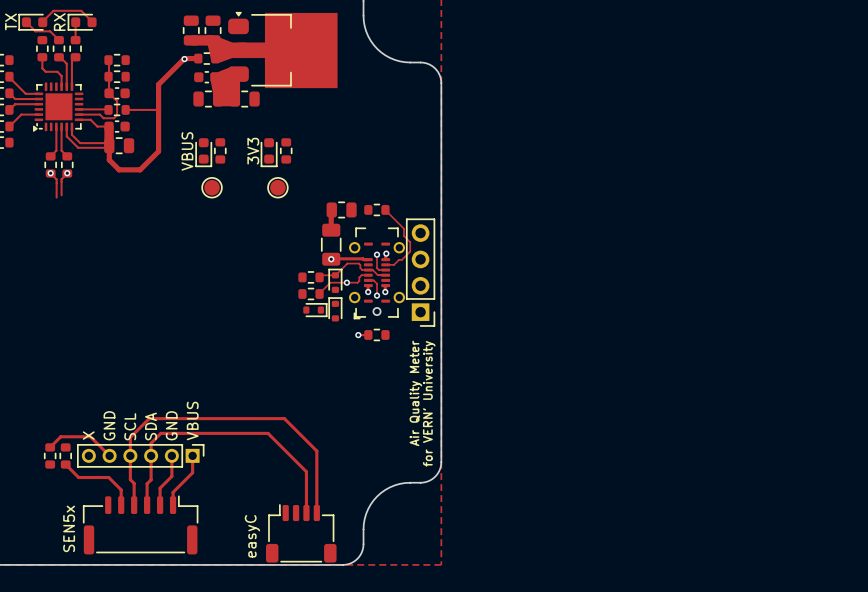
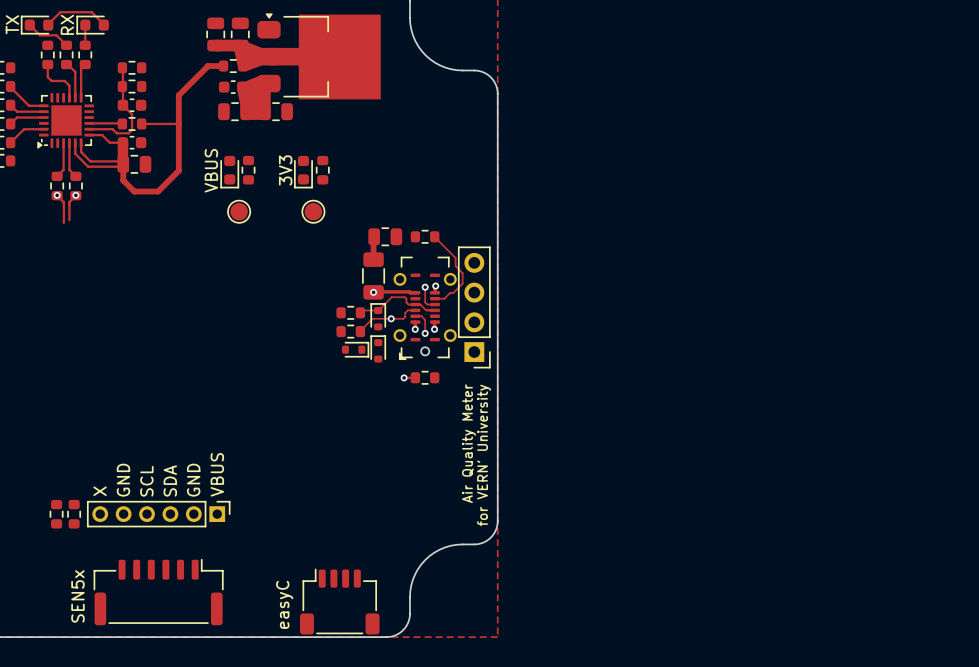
via: (184, 59) -> none
track: (50, 447) (60, 436) (90, 436) (109, 455) -> none
track: (171, 455) (171, 476) (160, 488) (160, 505) -> none
track: (192, 455) (192, 472) (173, 492) (173, 505) -> none
track: (65, 464) (78, 477) (108, 477) (121, 489) (121, 505) -> none
track: (134, 505) (134, 483) (130, 479) (130, 437) (149, 418) (284, 418) (316, 451) (316, 513) -> none
track: (147, 505) (147, 483) (151, 479) (151, 443) (160, 433) (268, 433) (306, 471) (306, 513) -> none

